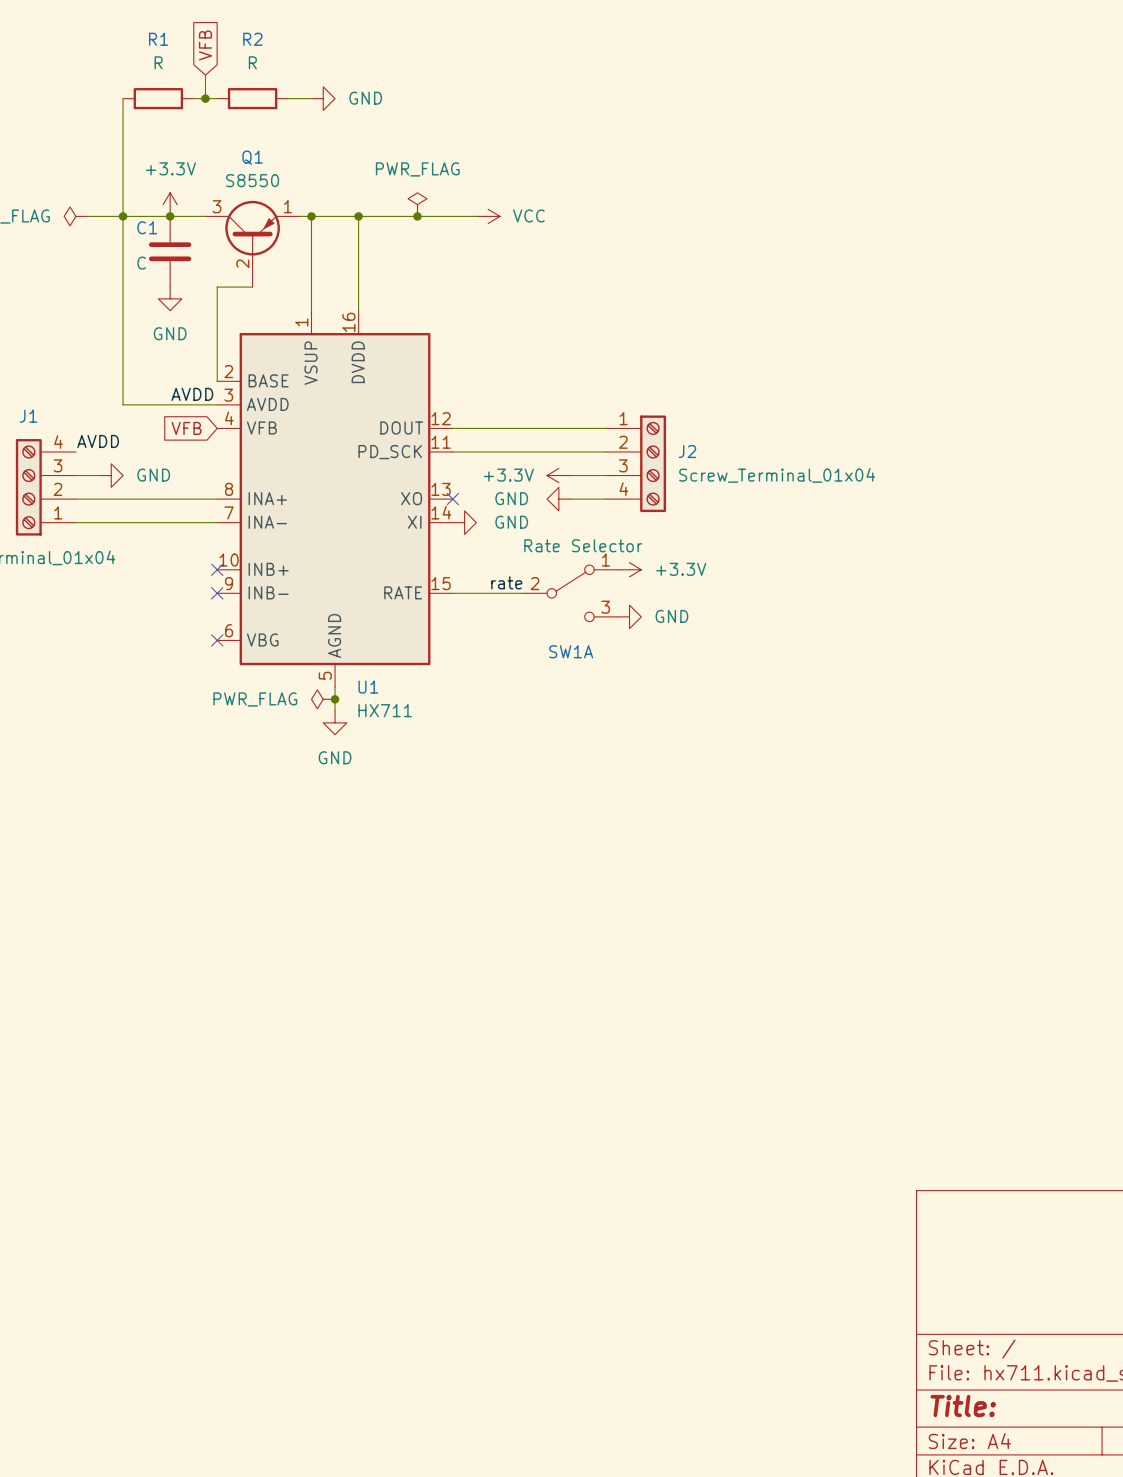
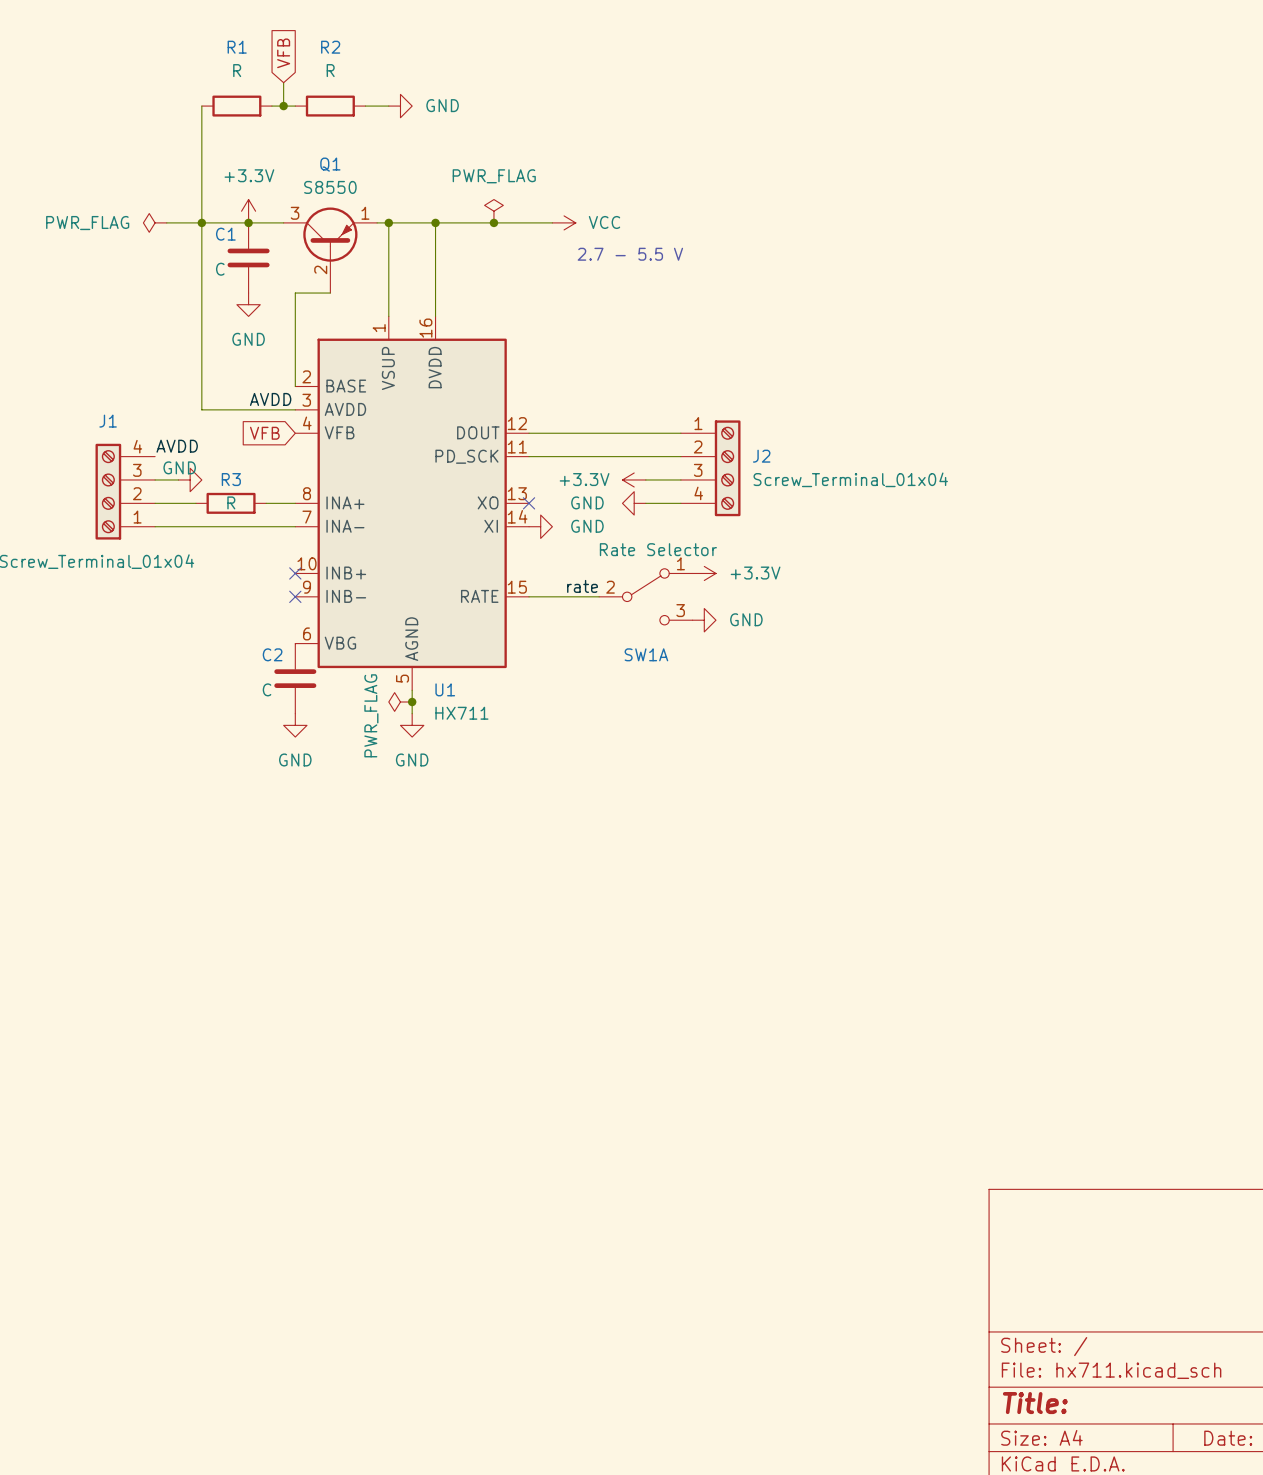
text: none -> 2.7 - 5.5 V (630, 254)
power symbol text position: GND (153, 475) -> GND (179, 467)
wire: (117, 499) (187, 499) -> none
R3: none -> R (231, 503)
no-connect mark: (217, 640) -> none
C2: none -> C (295, 678)
power symbol text rotation: 0° (255, 699) -> 90° counterclockwise (371, 715)
power symbol: none -> GND (295, 725)

